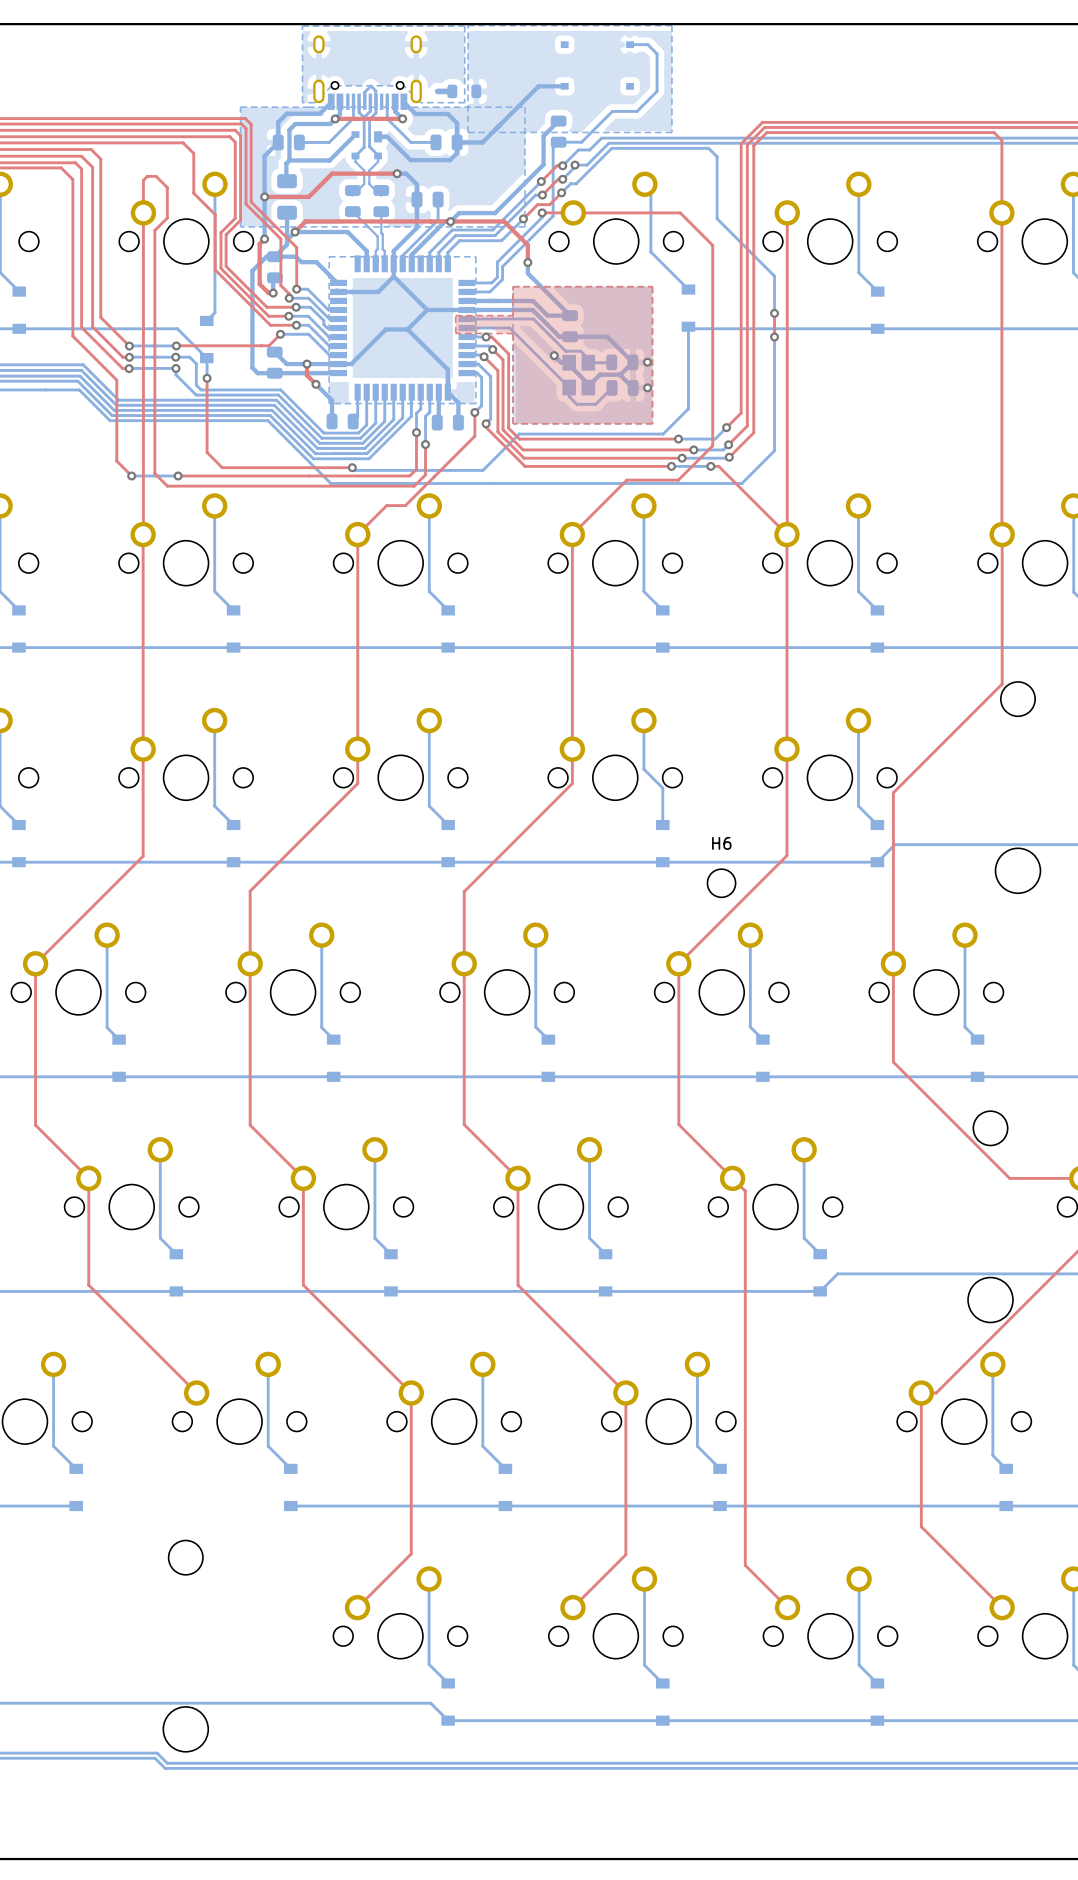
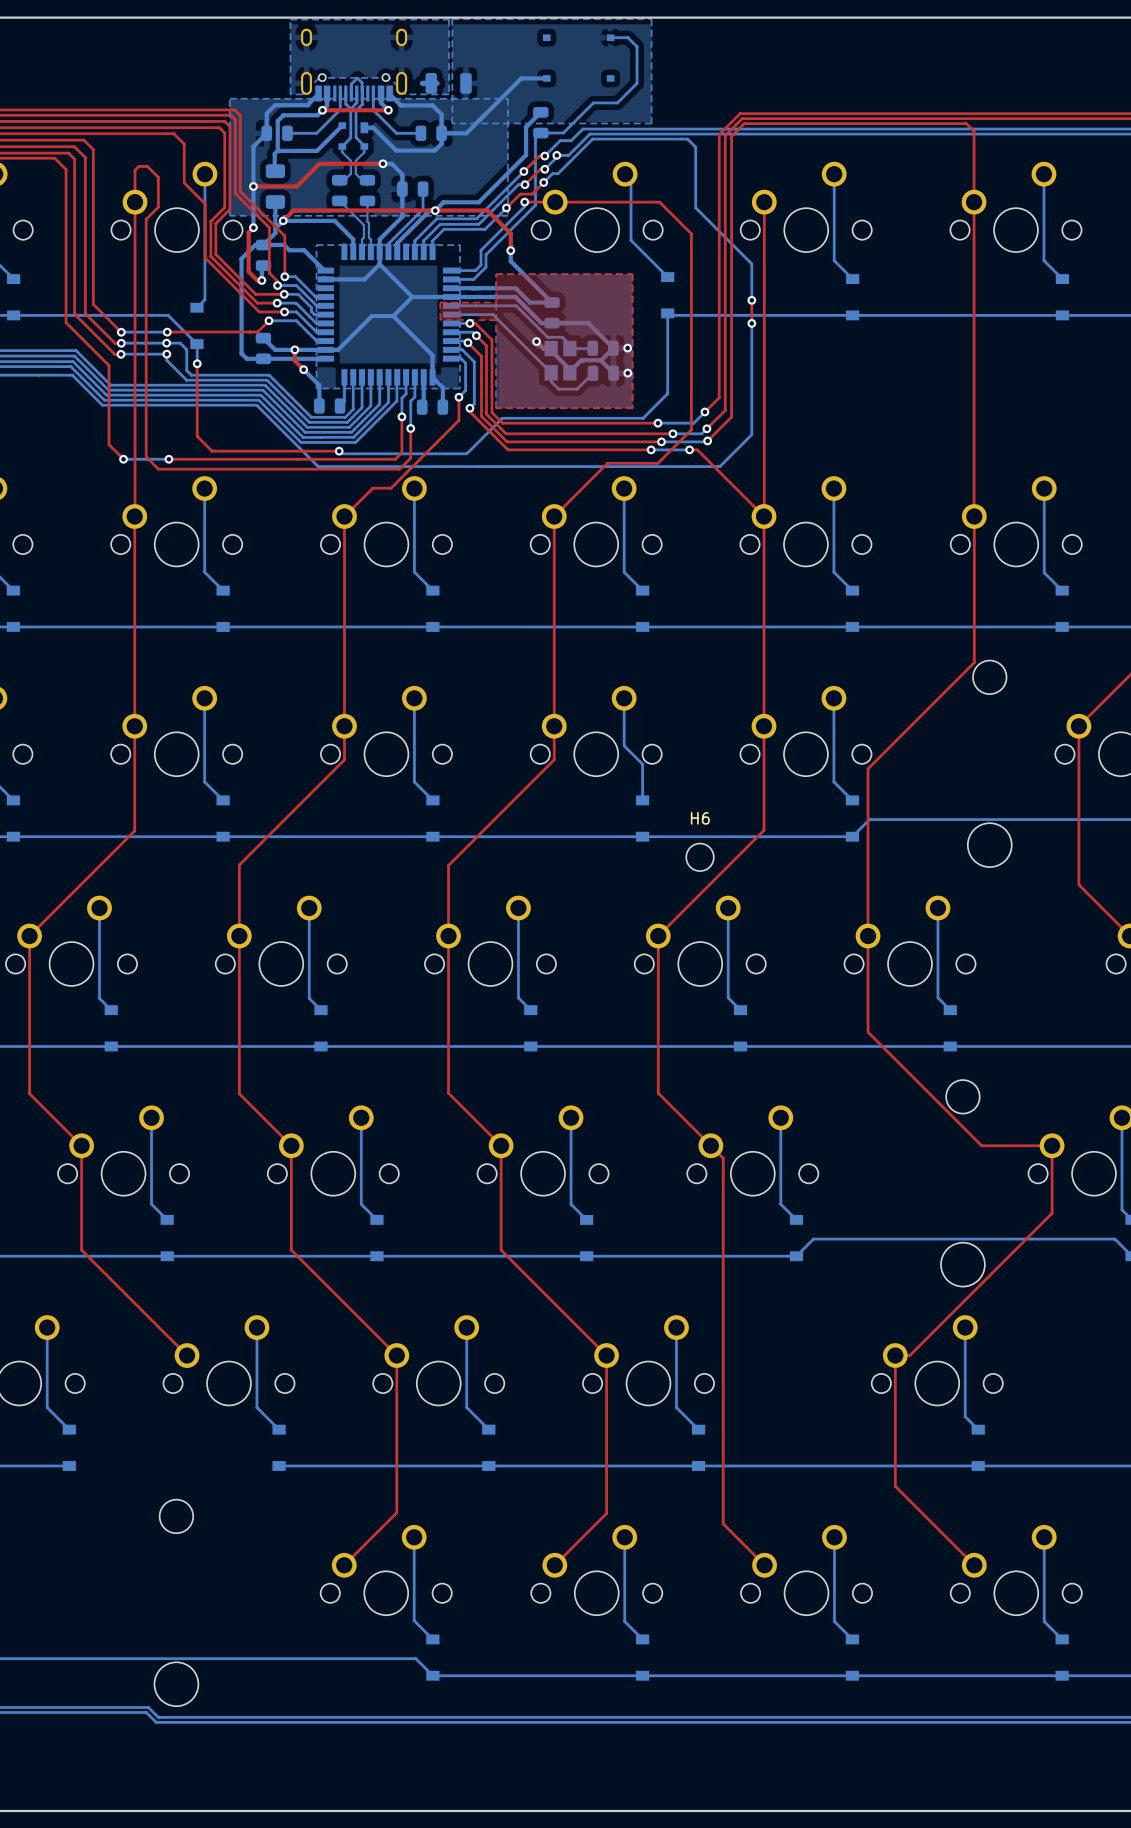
part footprint: [447, 84, 482, 99] -> [425, 72, 472, 94]

